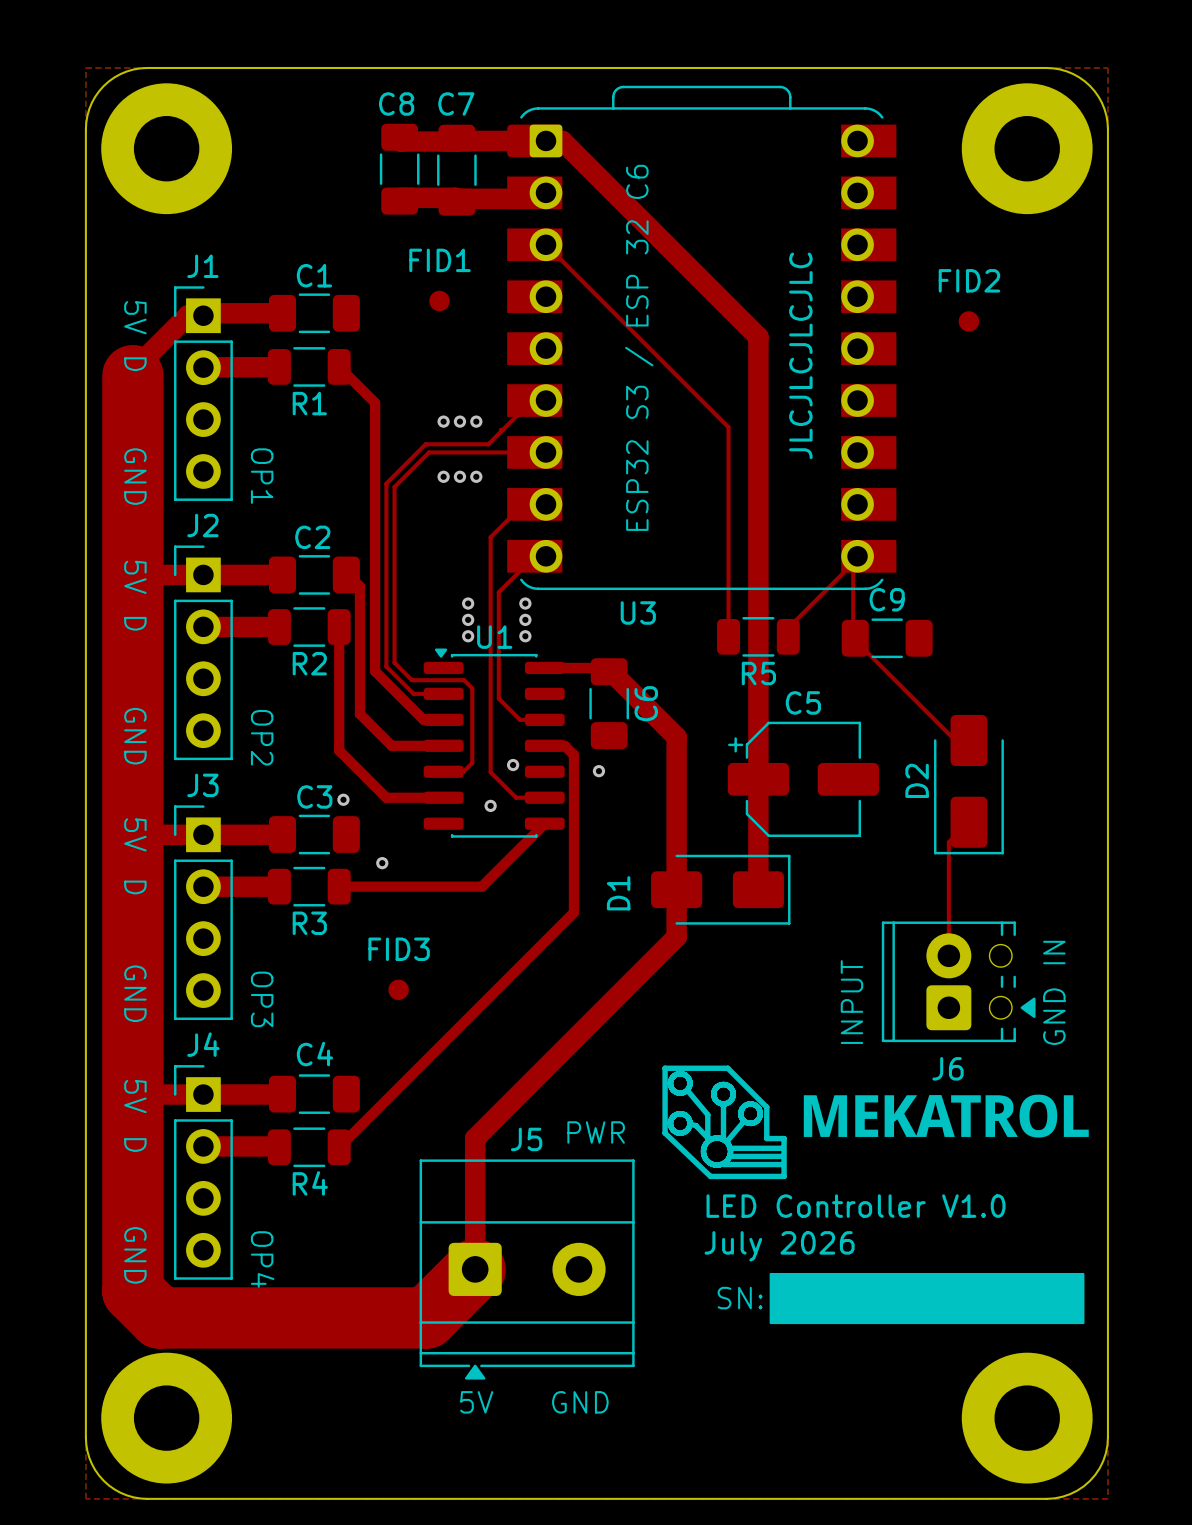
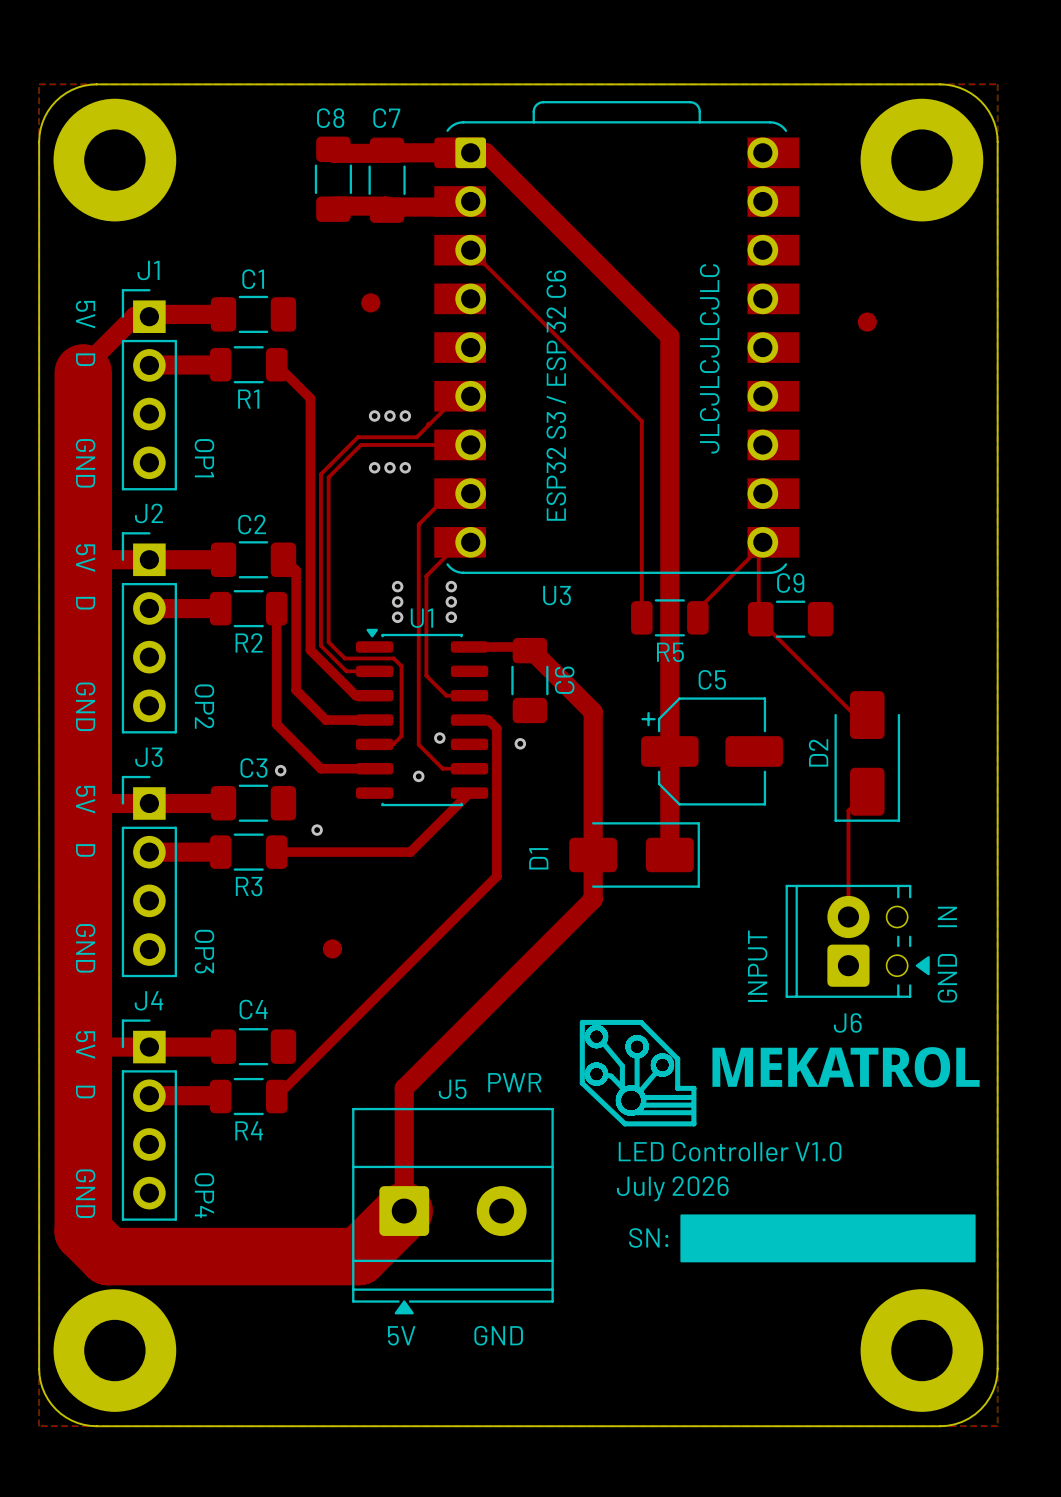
FID1 name: FID1 (440, 260) -> none
FID2 name: FID2 (969, 280) -> none
FID3 name: FID3 (399, 949) -> none

